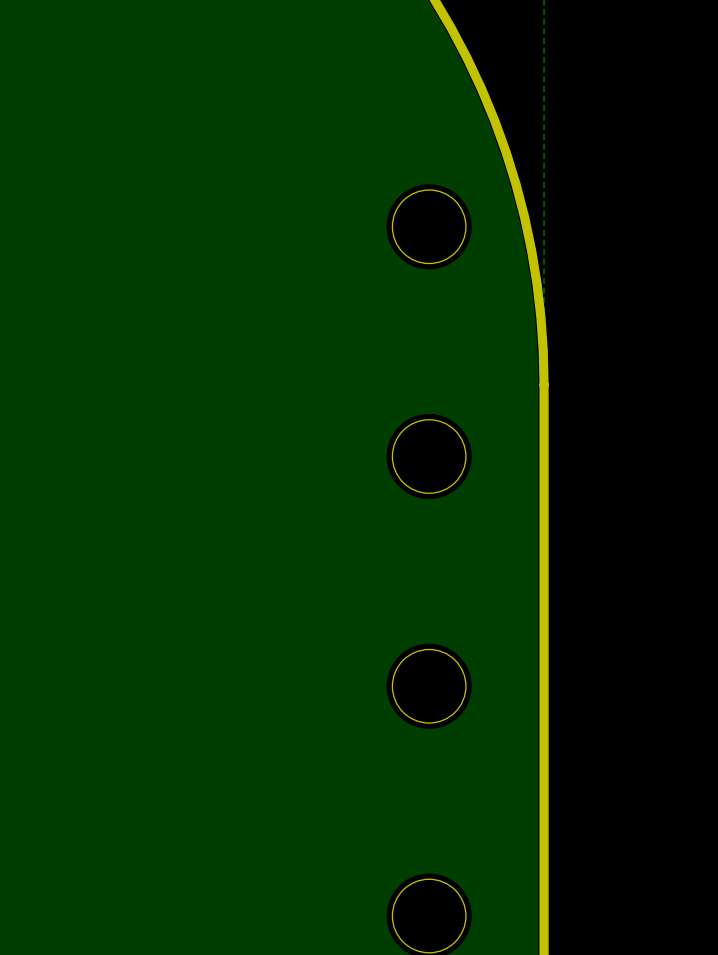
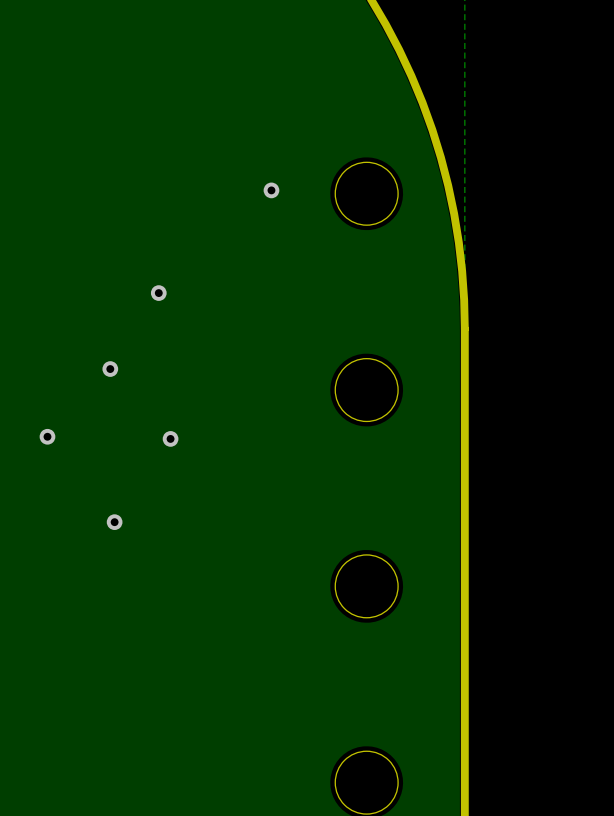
via: none -> (271, 190)
via: none -> (158, 293)
via: none -> (110, 369)
via: none -> (47, 436)
via: none -> (170, 438)
via: none -> (114, 522)

